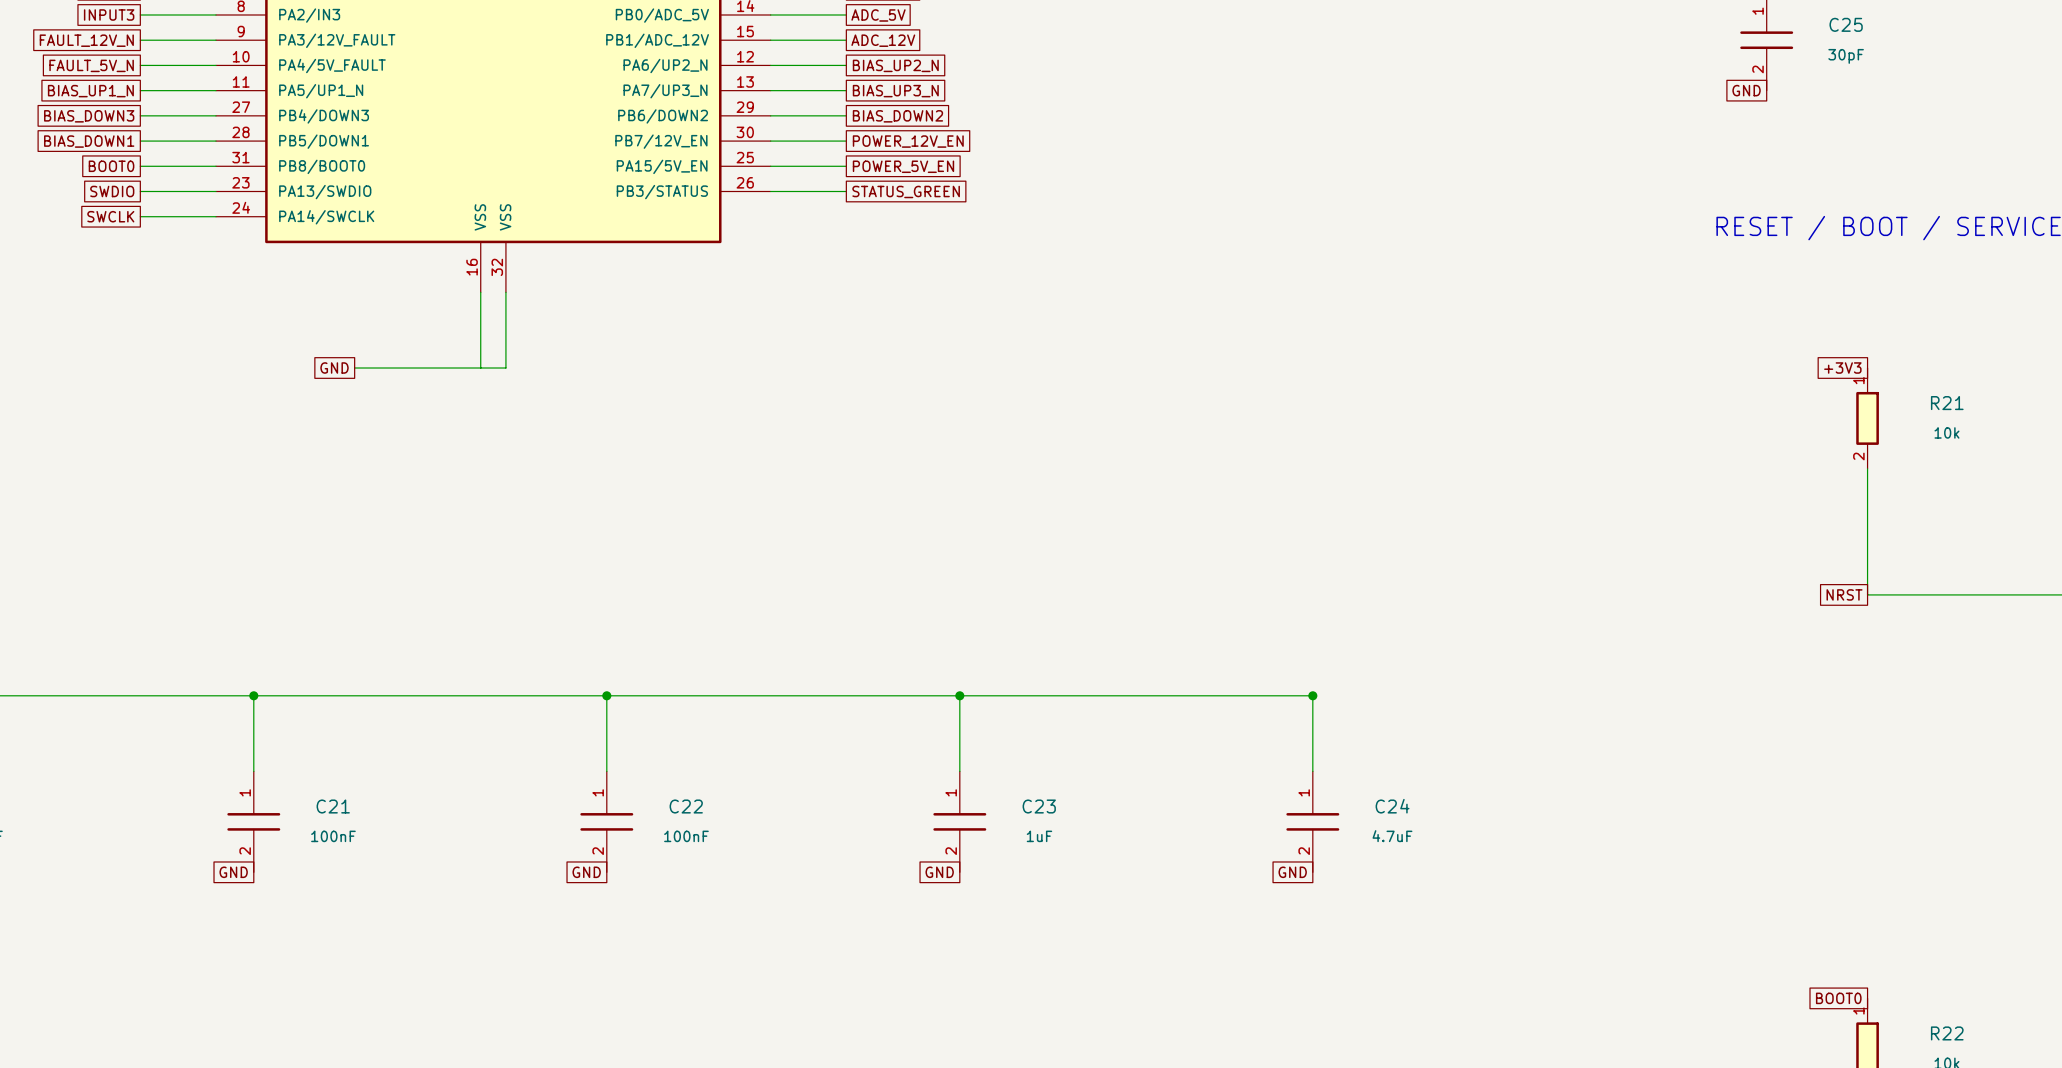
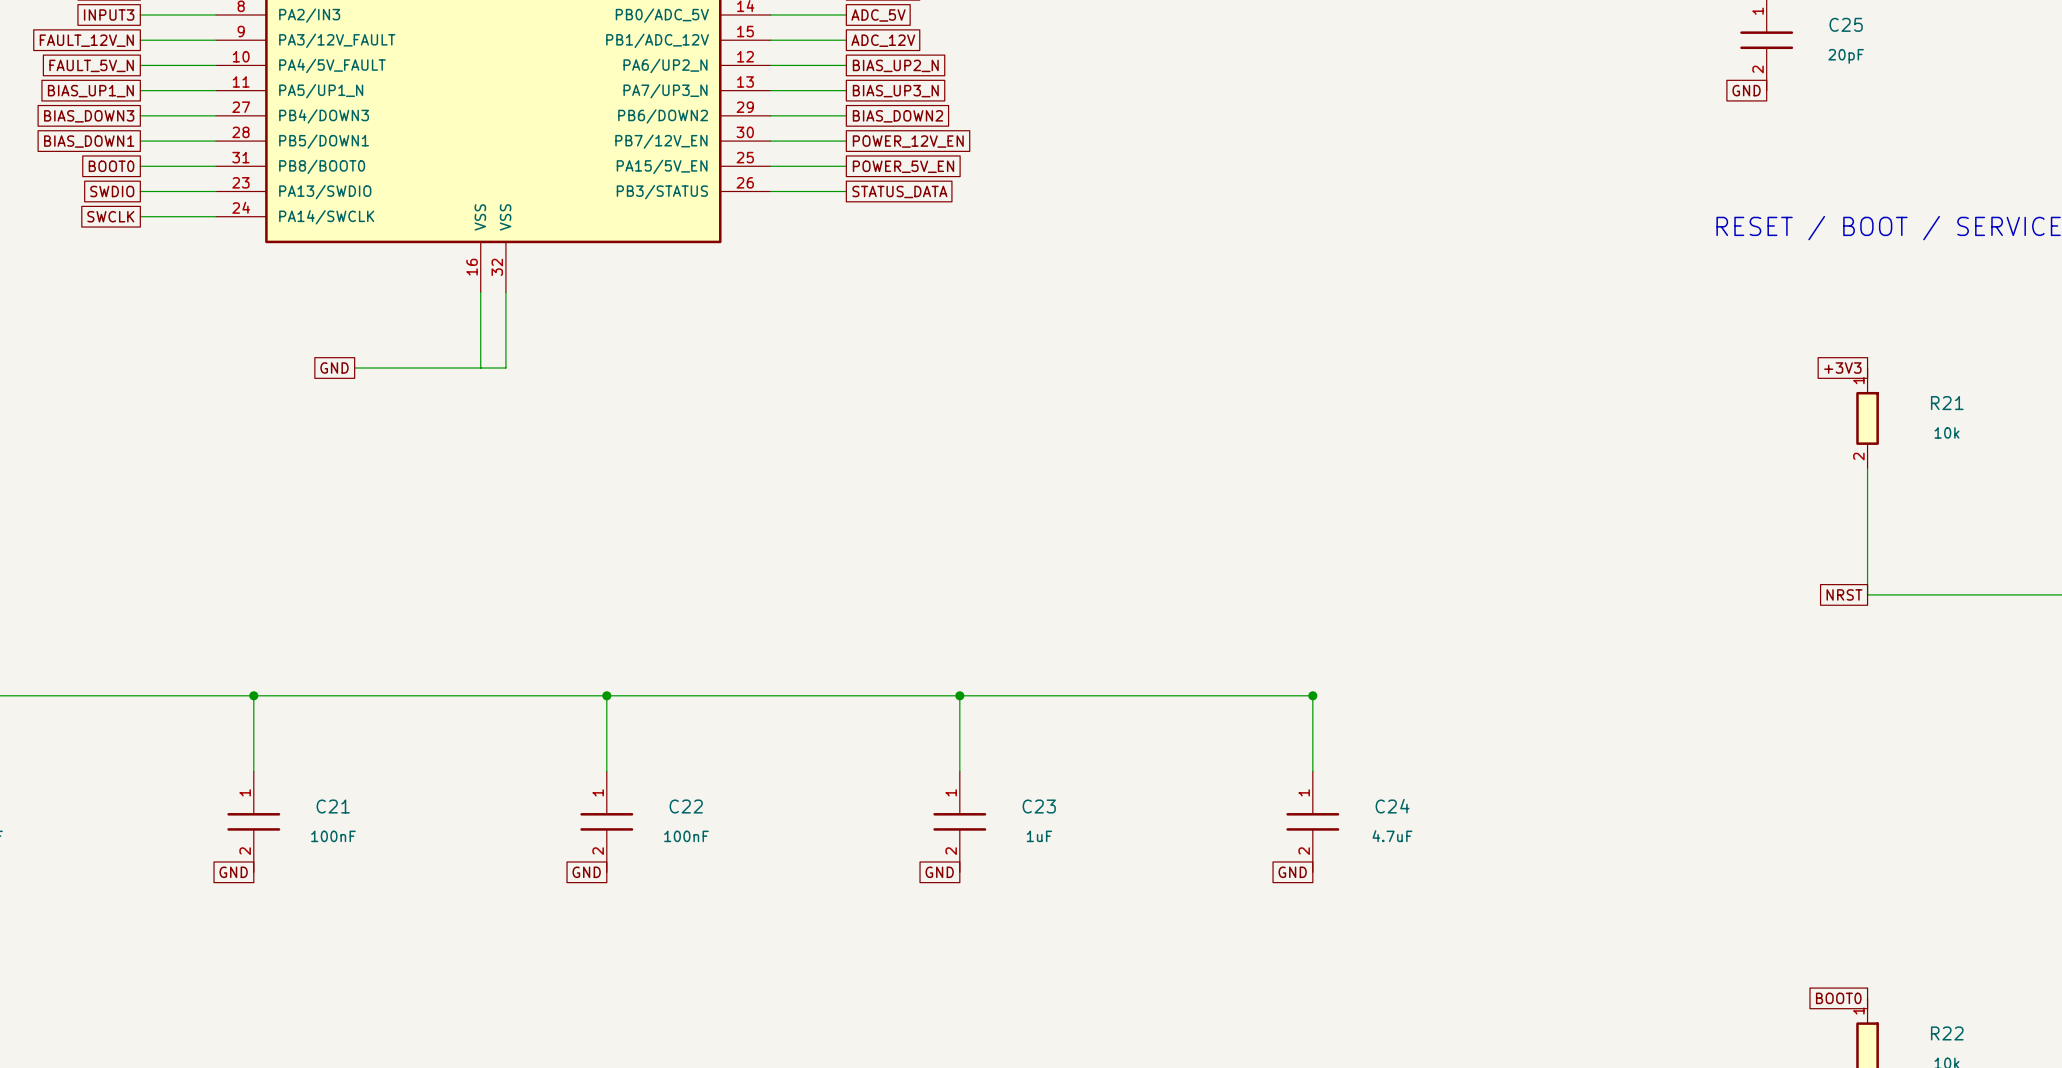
C25 value: 30pF (1846, 56) -> 20pF (1846, 56)
global label: STATUS_GREEN (906, 191) -> STATUS_DATA (899, 191)

